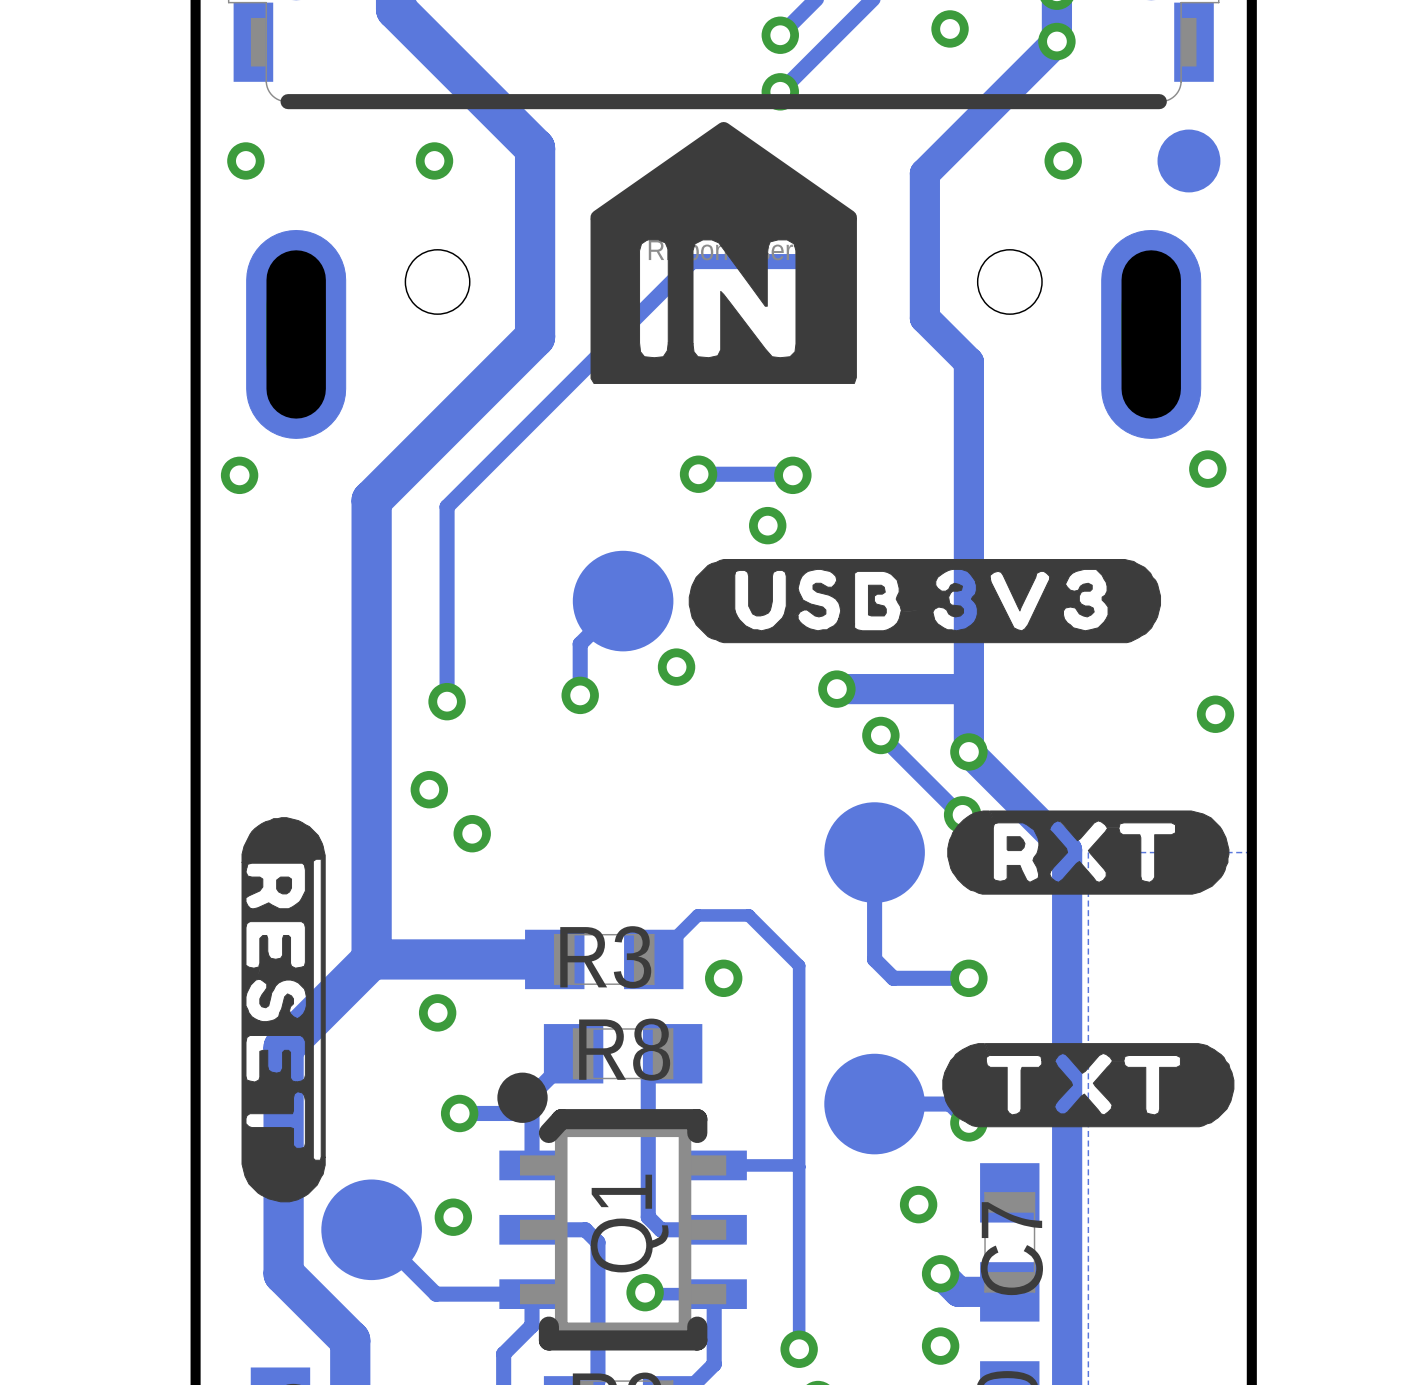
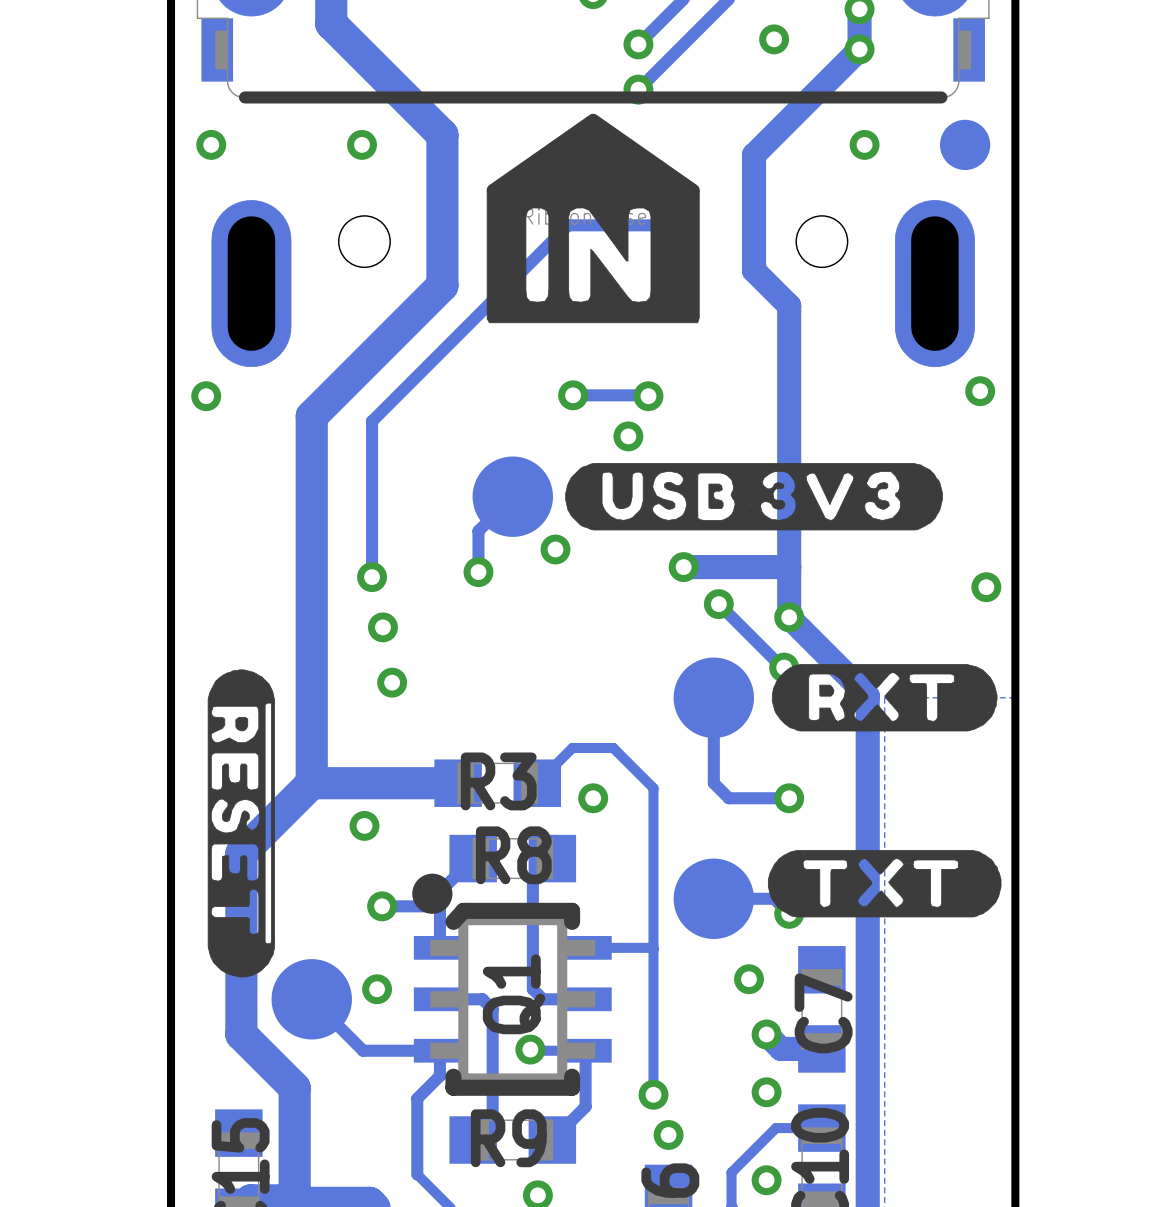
via position: (429, 789) -> (382, 627)

